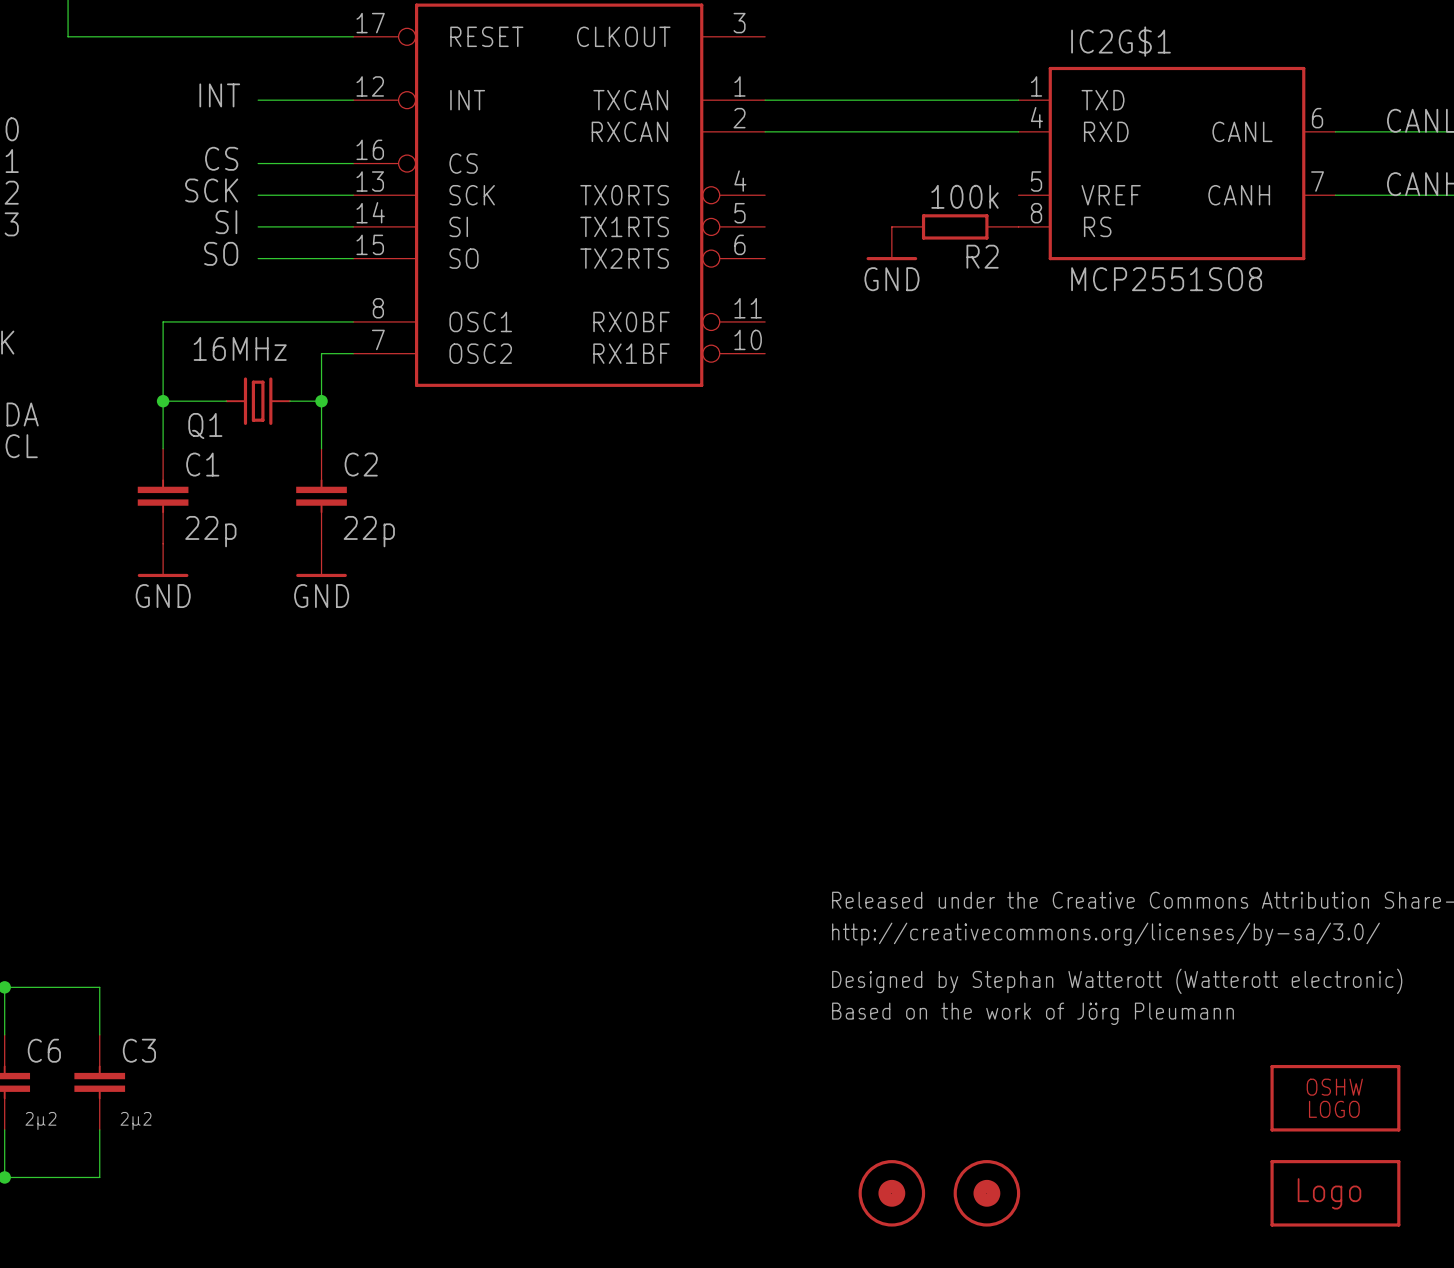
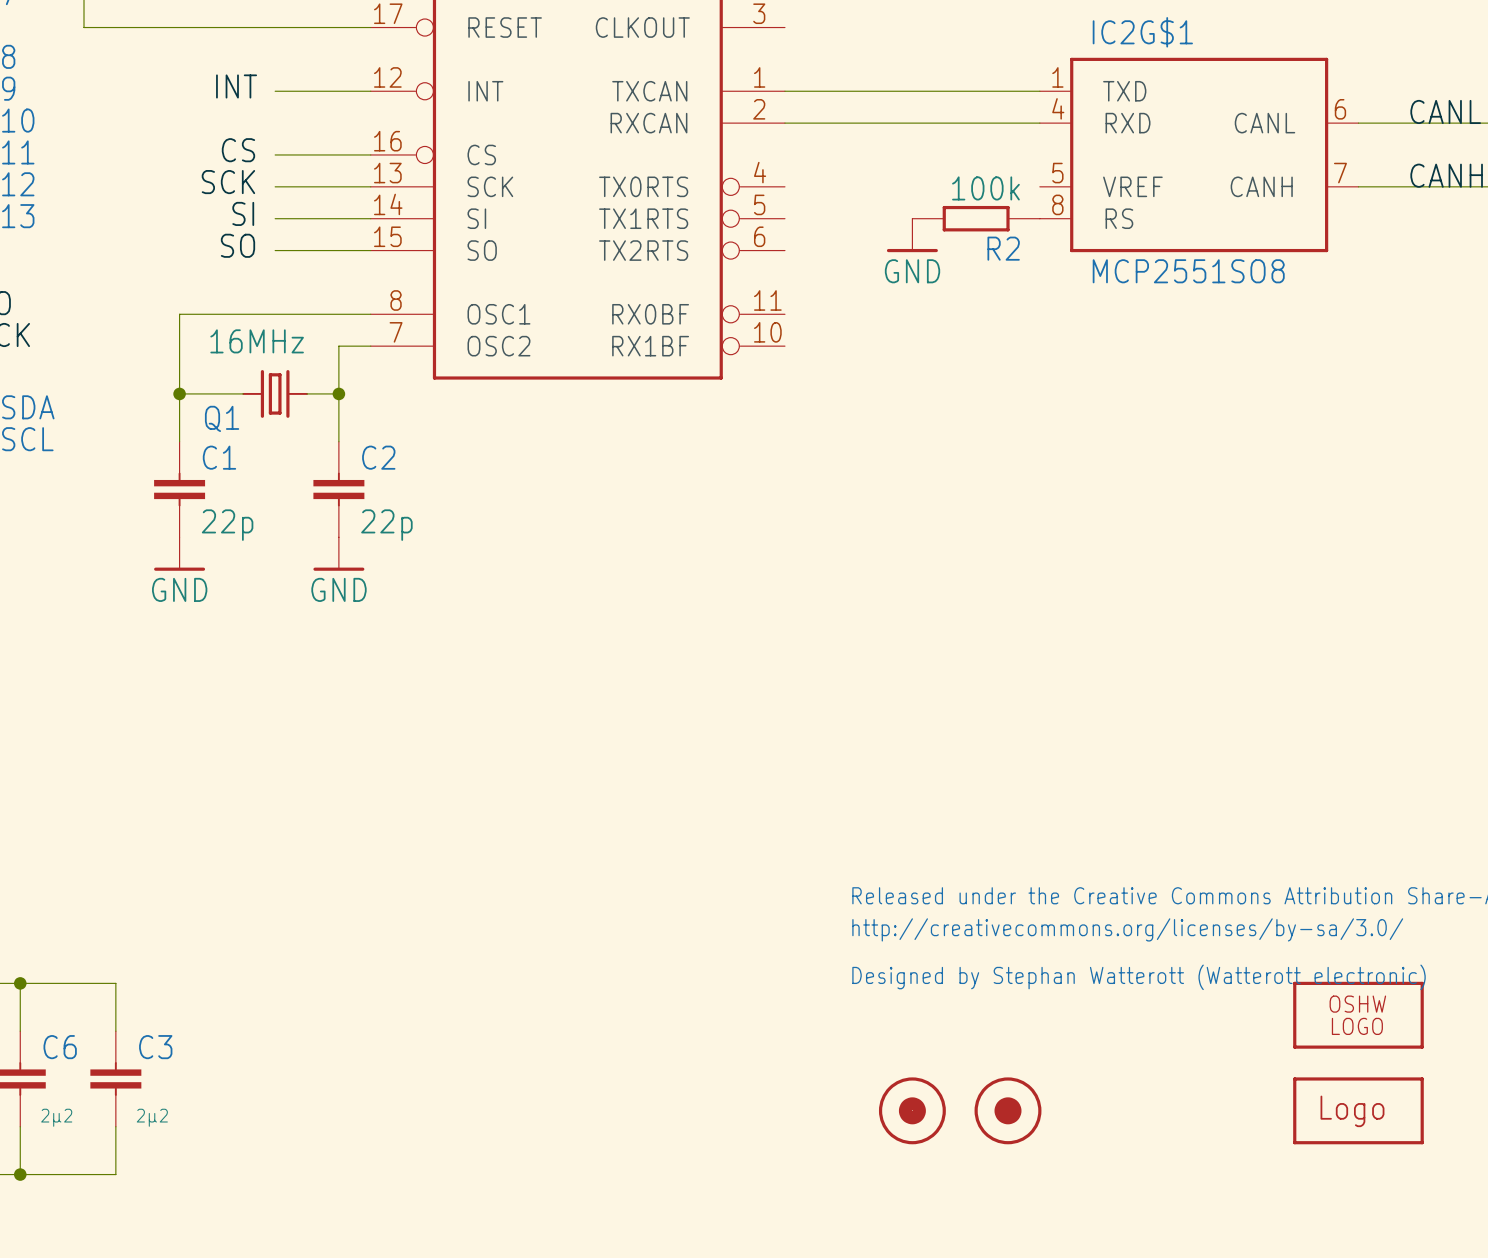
text: Based on the work of Jörg Pleumann (1033, 1013) -> none
part position: (1335, 1098) -> (1358, 1015)
part: none -> (912, 1110)
part: none -> (1007, 1110)
part: (891, 1193) -> none
part: (986, 1193) -> none
part position: (1335, 1193) -> (1358, 1110)

